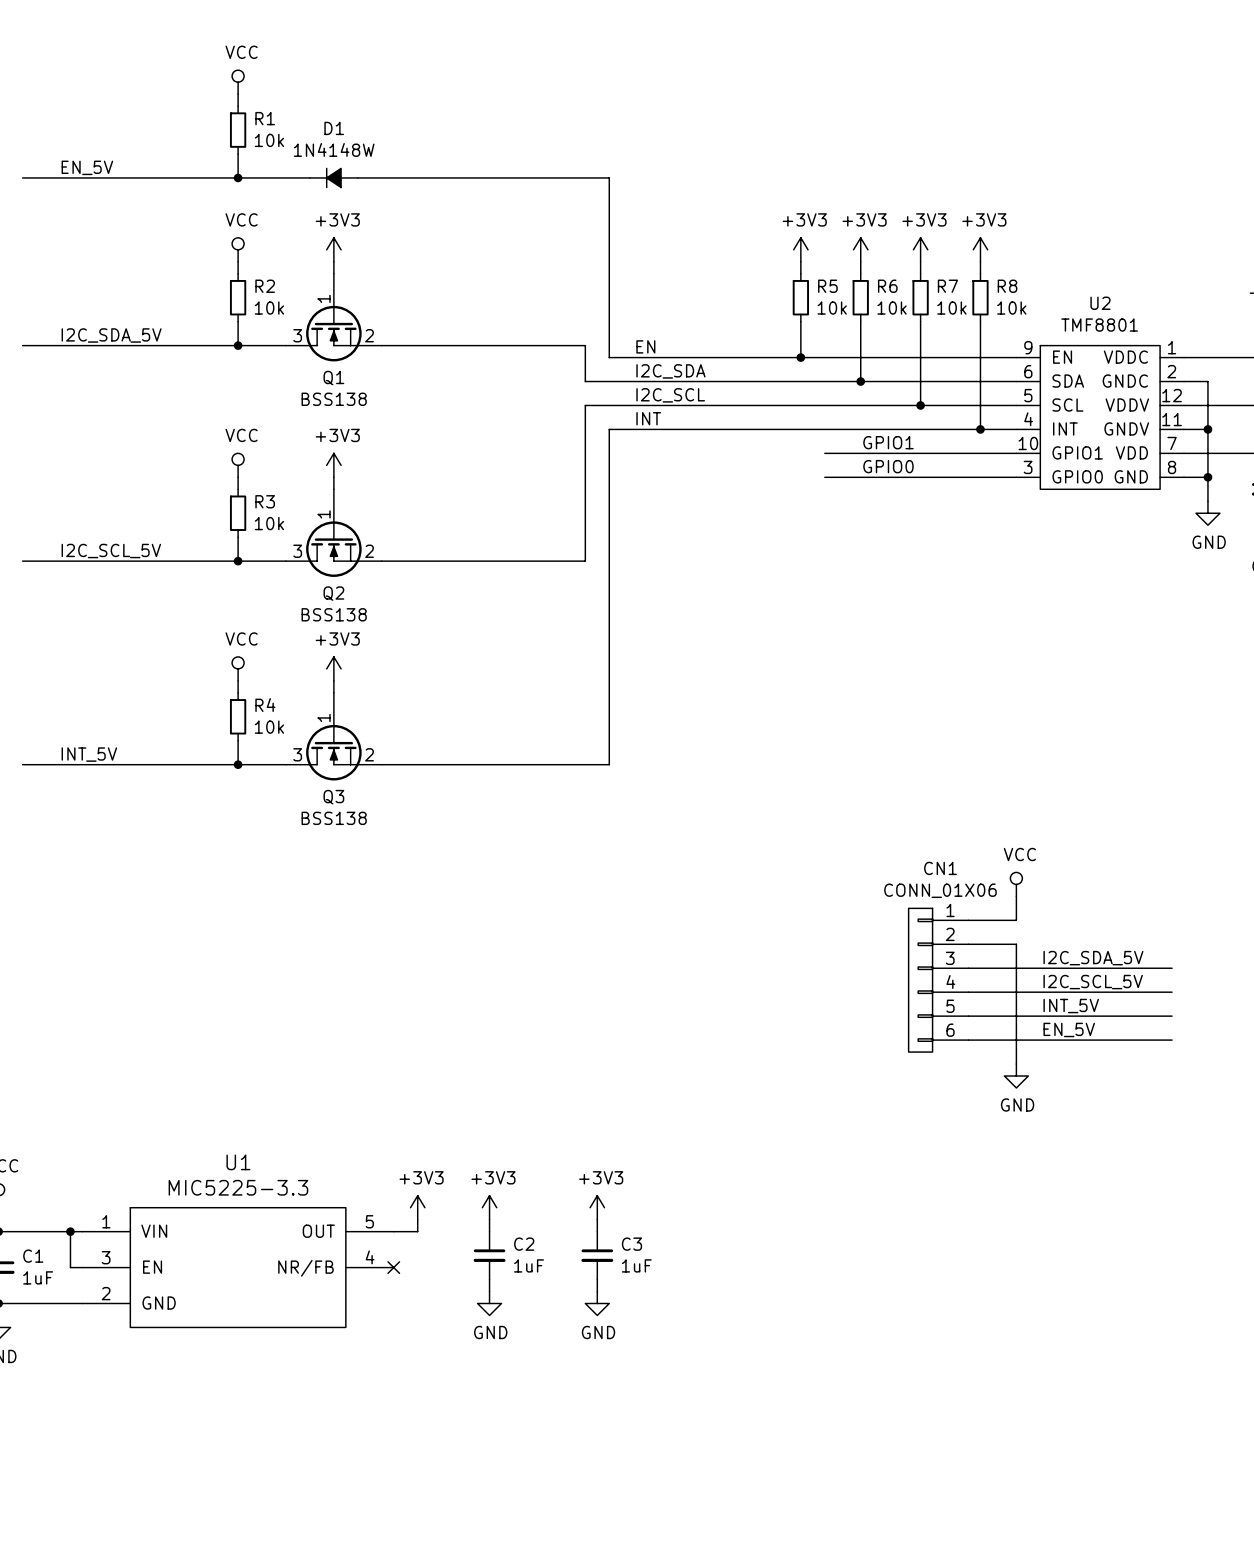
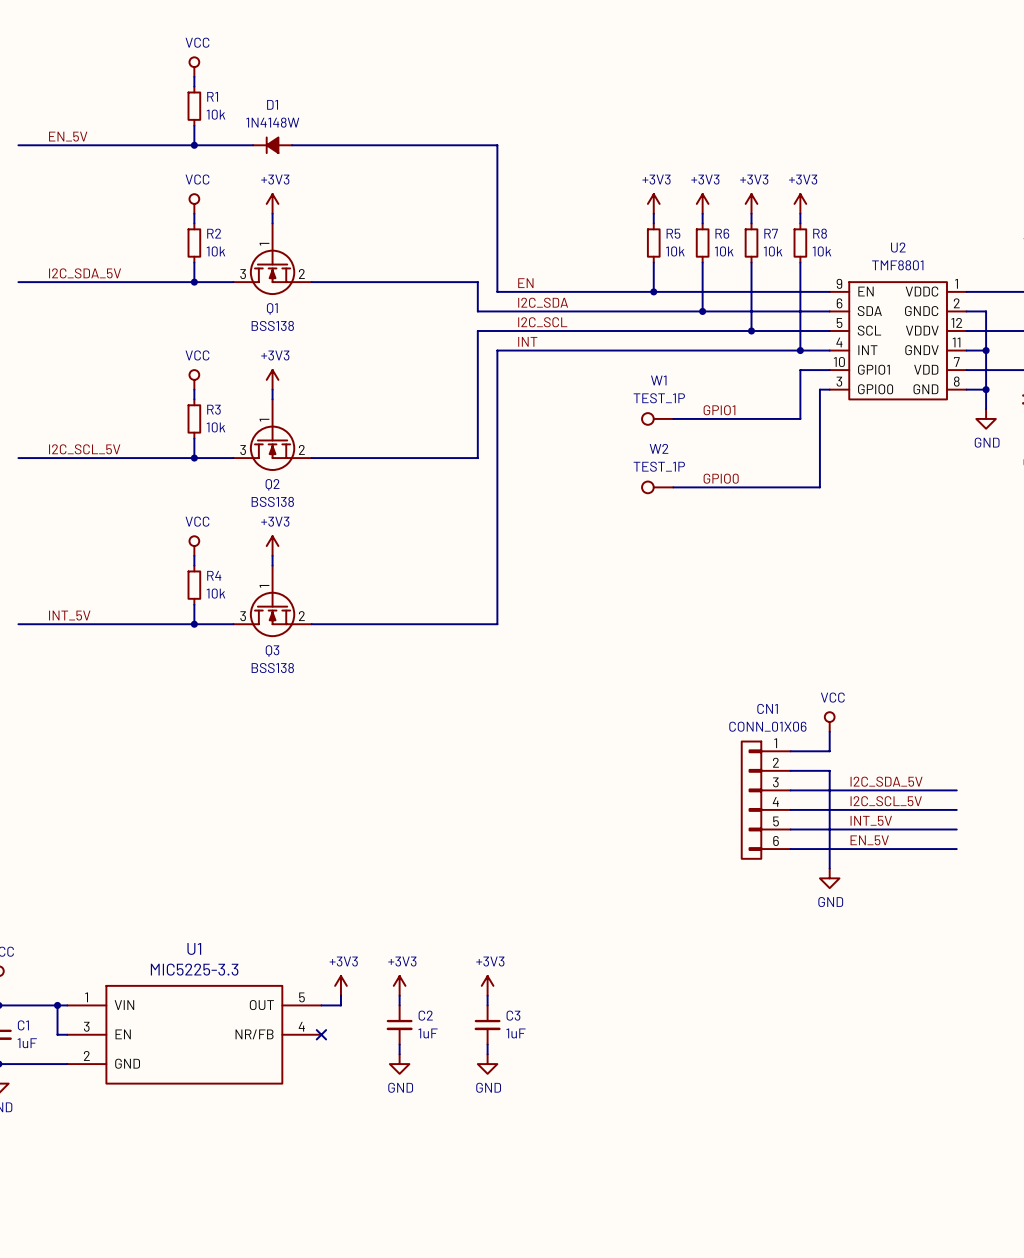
label position: GPIO1 (888, 442) -> GPIO1 (719, 410)
wire: (824, 453) (980, 453) -> (673, 418) (800, 418) (800, 370)
label position: GPIO0 (888, 466) -> GPIO0 (721, 478)
wire: (824, 477) (1004, 477) -> (673, 487) (819, 487) (819, 389)
W1: none -> TEST_1P (657, 418)
W2: none -> TEST_1P (657, 487)

